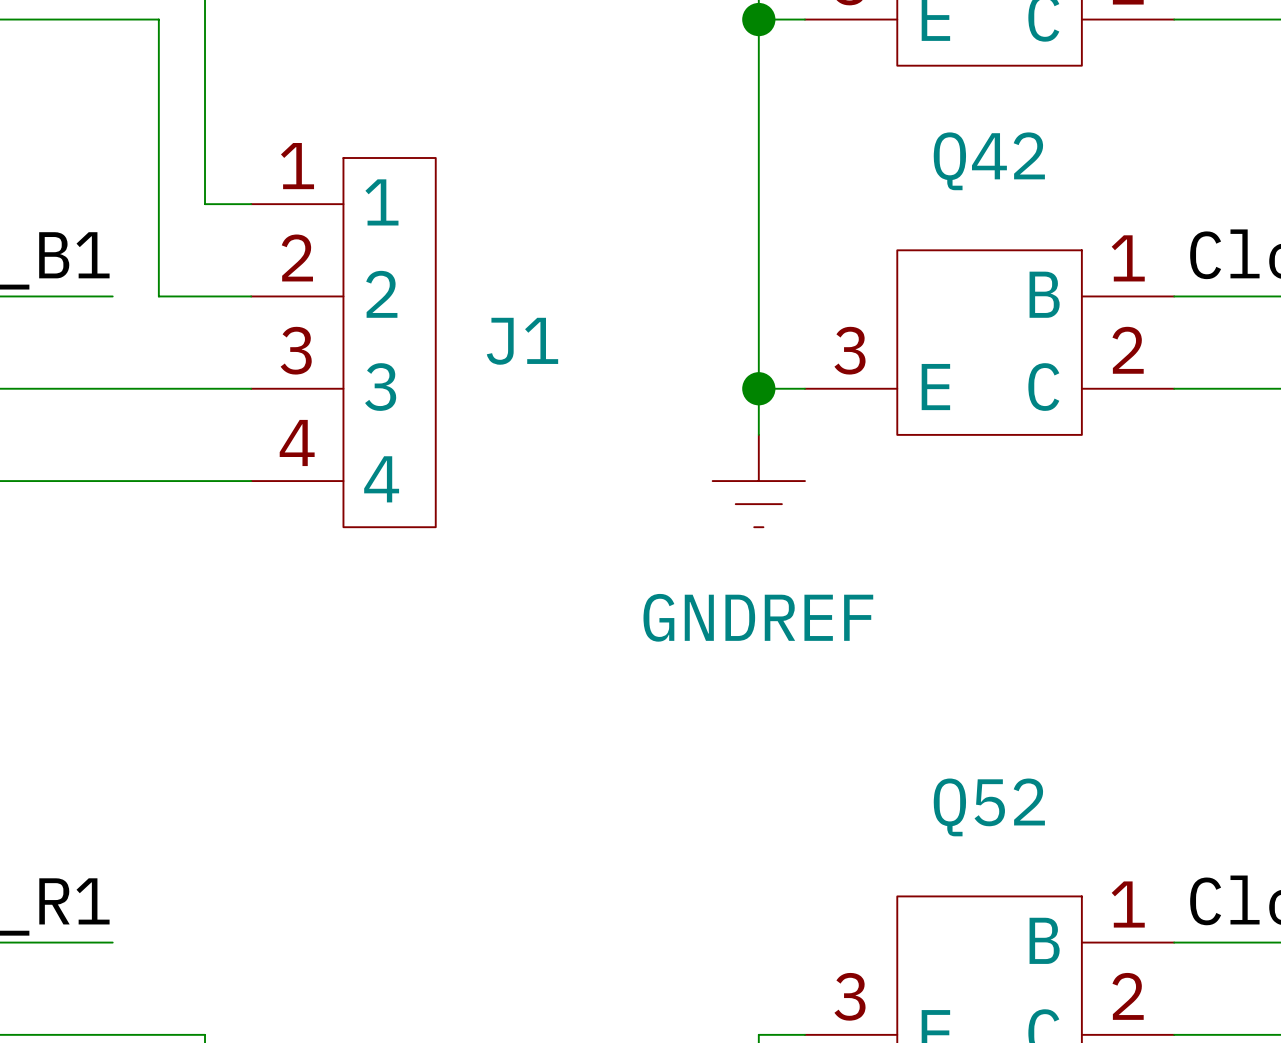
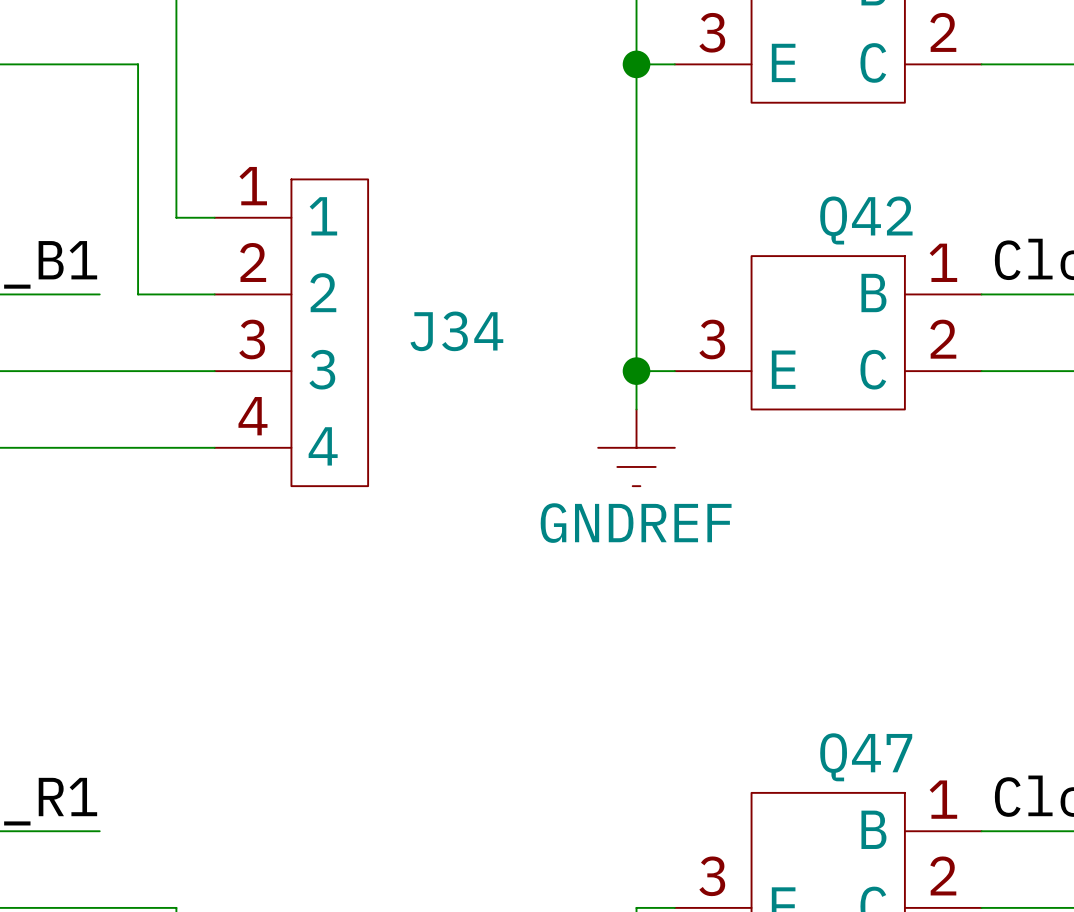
Q42 name position: Q42 (989, 161) -> Q42 (866, 220)
J1 name: J1 (522, 341) -> J34 (456, 331)
power symbol text position: GNDREF (758, 617) -> GNDREF (636, 523)
Q52 name: Q52 (989, 807) -> Q47 (866, 757)

